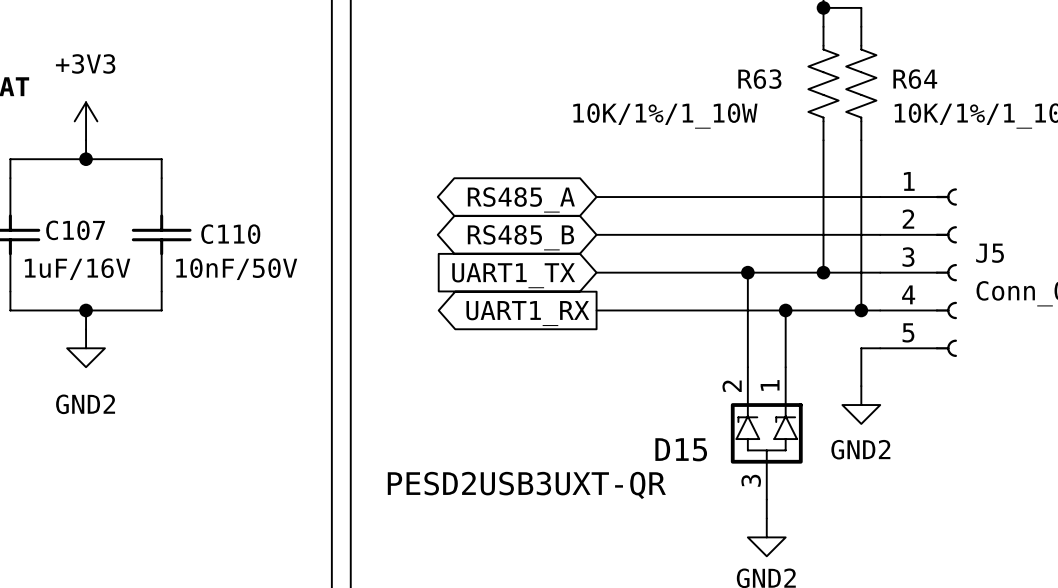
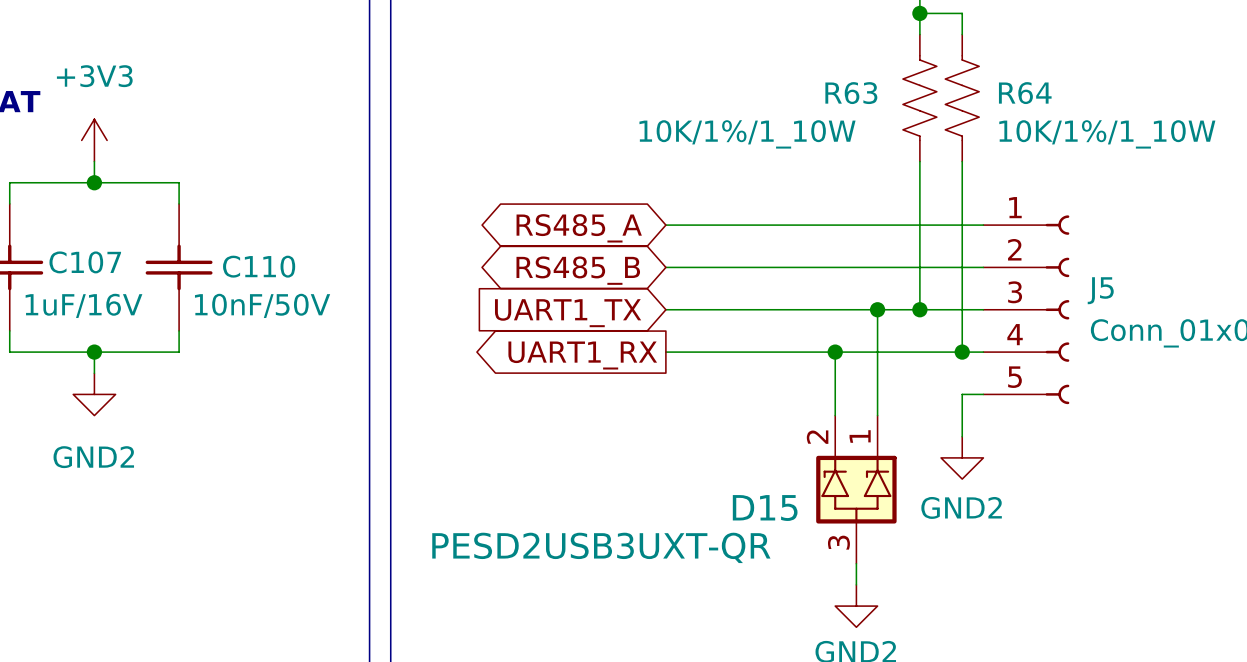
wire: (747, 272) (747, 310) -> (877, 309) (877, 352)
junction: (747, 272) -> none
junction: none -> (877, 309)
junction: none -> (835, 352)
junction: (785, 310) -> none

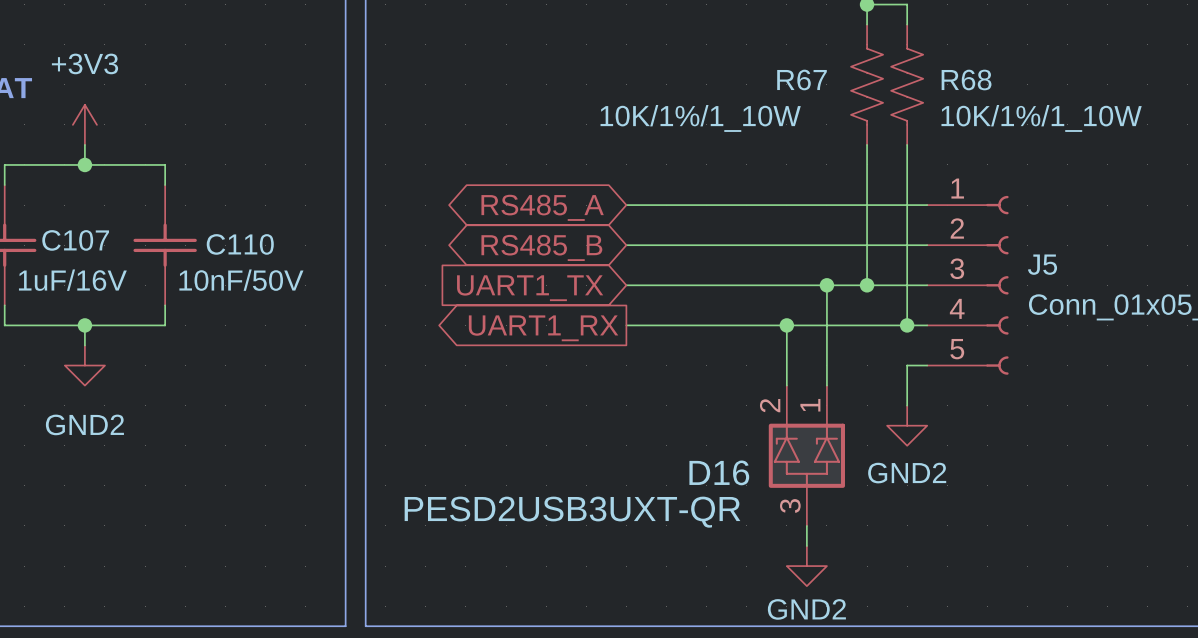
R63 name: R63 (851, 93) -> R67 (802, 79)
R64 name: R64 (1025, 93) -> R68 (966, 79)
D15 name: D15 (765, 508) -> D16 (719, 472)

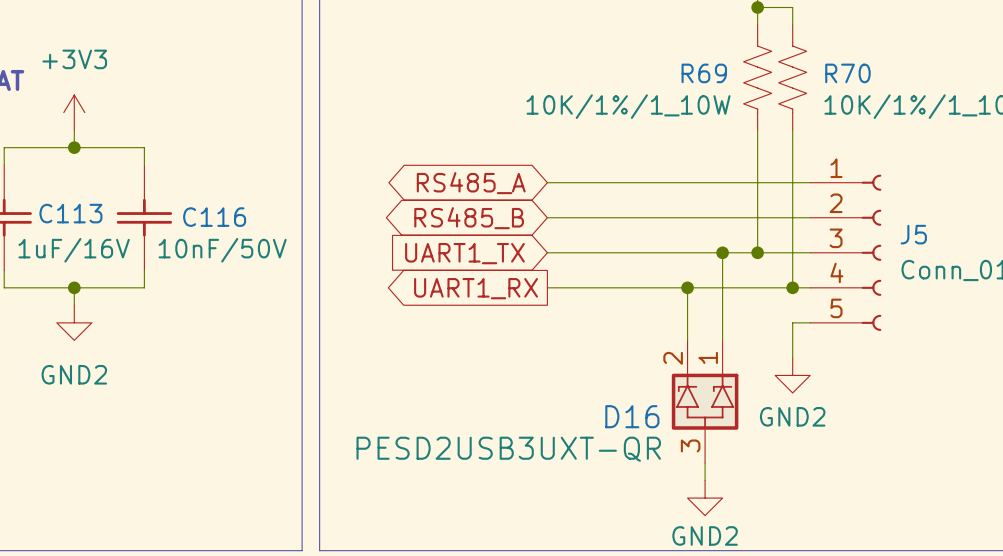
R67 name: R67 (802, 79) -> R69 (704, 73)
R68 name: R68 (966, 79) -> R70 (847, 73)
C107 name: C107 (75, 240) -> C113 (70, 213)
C110 name: C110 (240, 244) -> C116 (214, 217)

